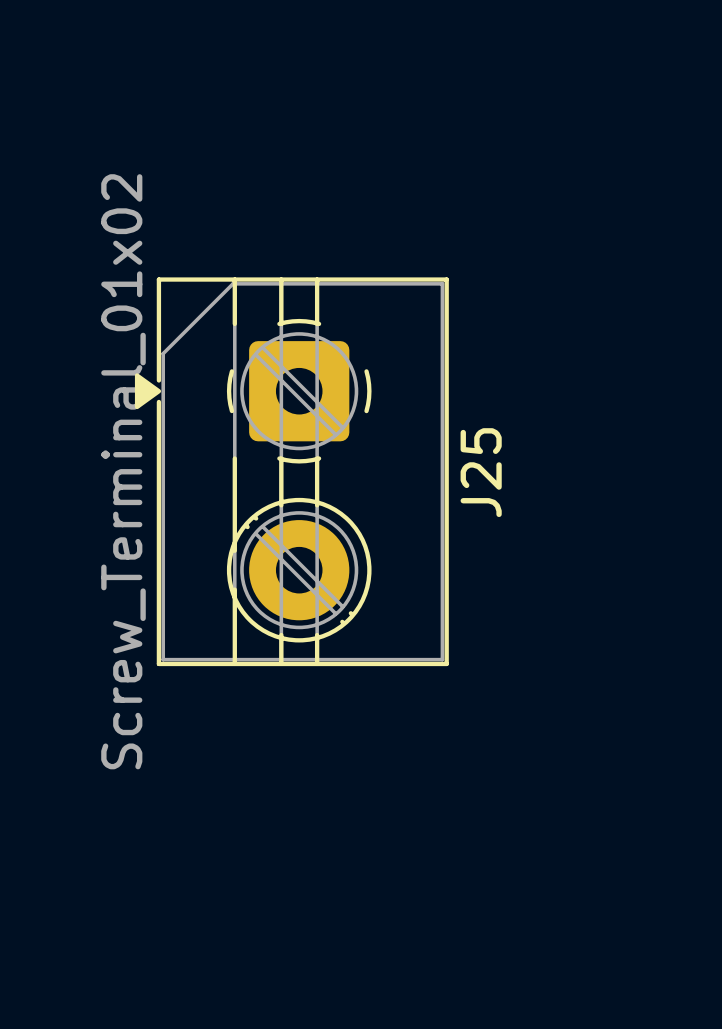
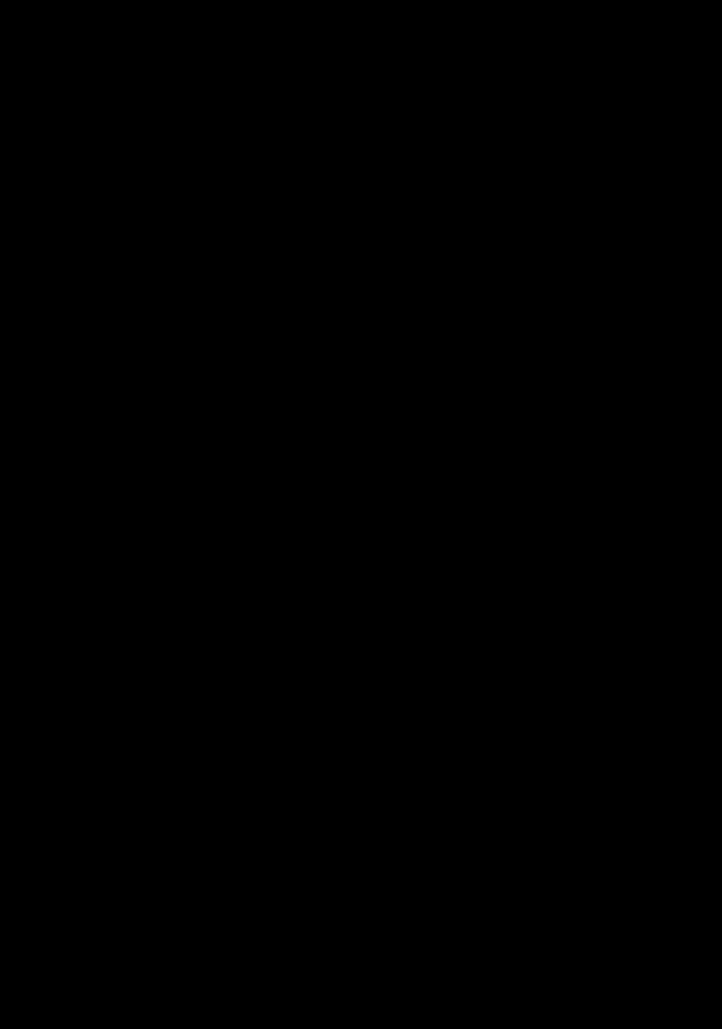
J25: Screw_Terminal_01x02 (291, 471) -> none

